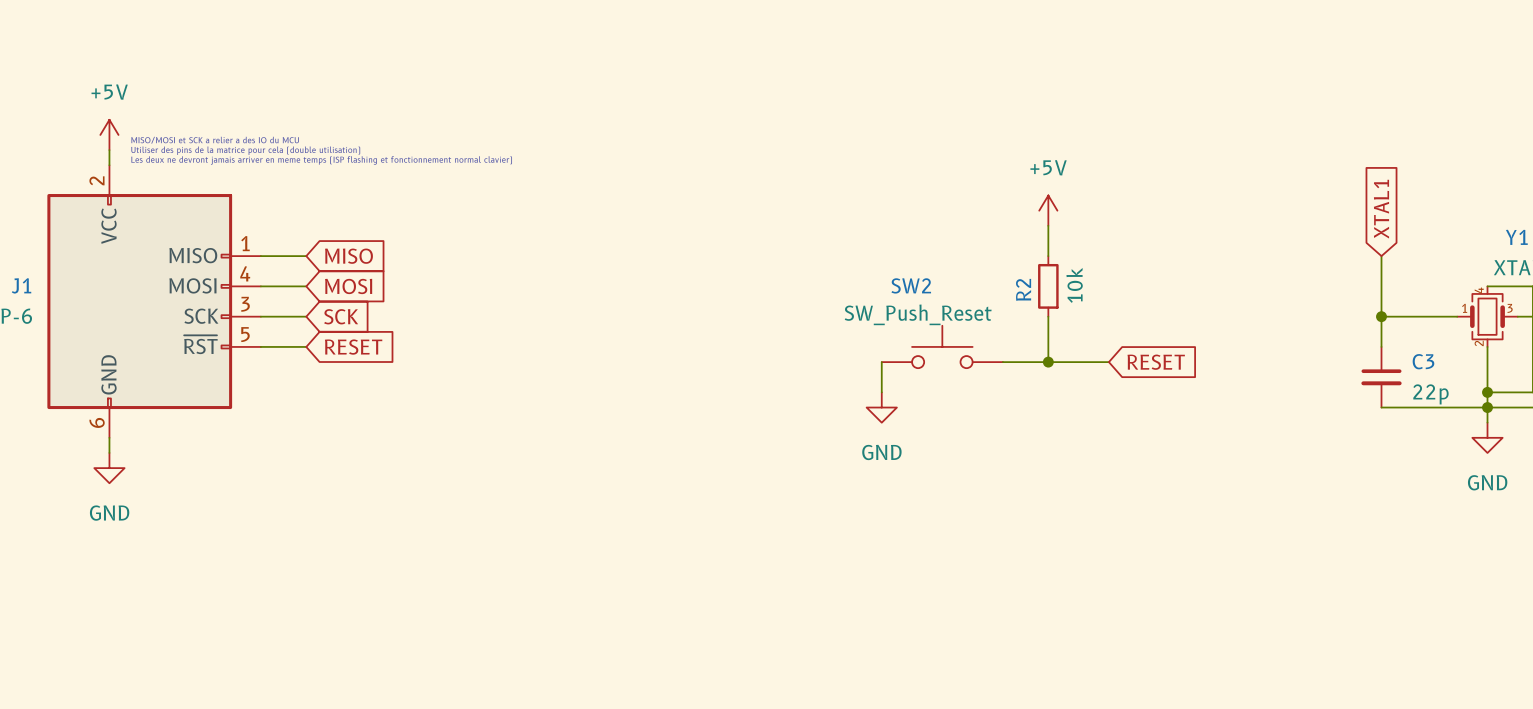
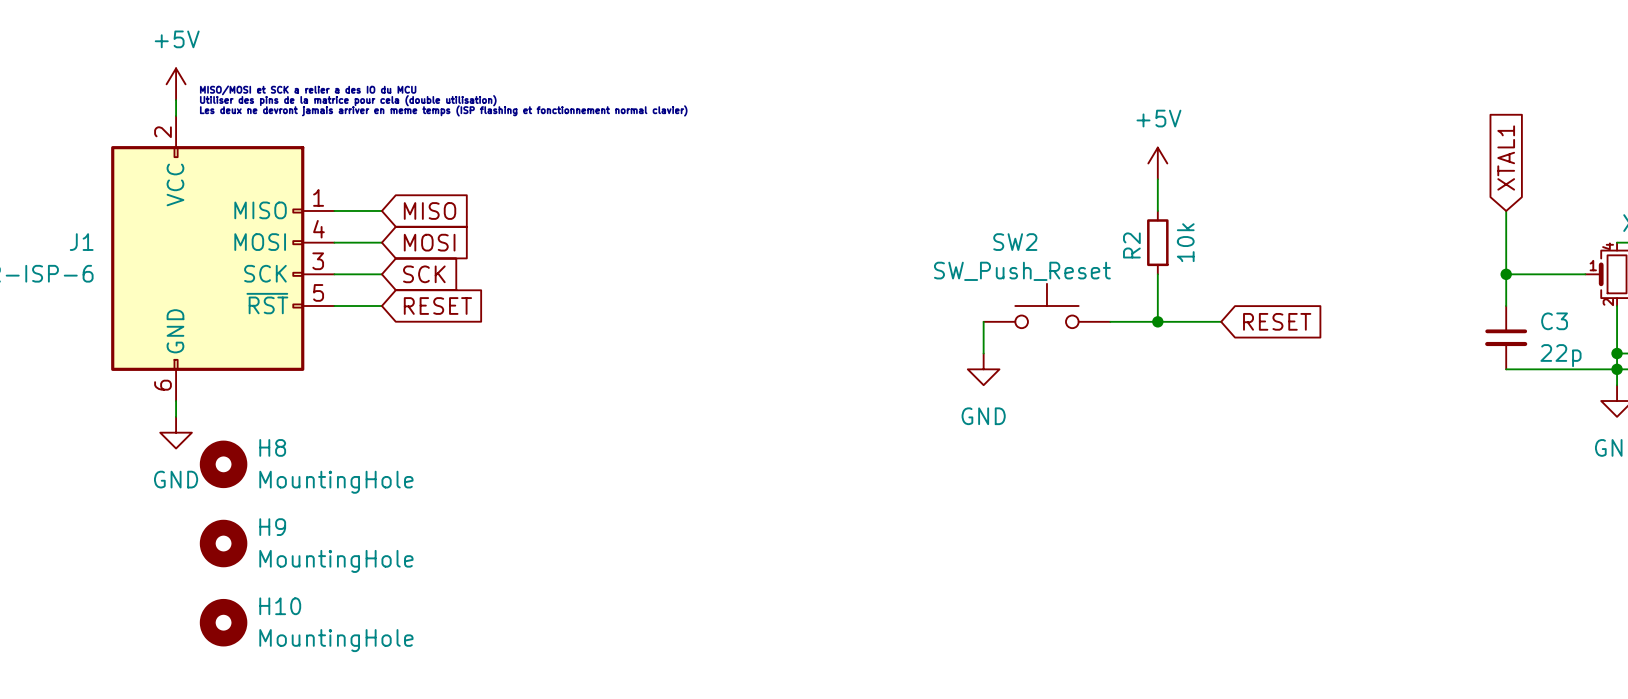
H8: none -> MountingHole (223, 464)
H9: none -> MountingHole (223, 543)
H10: none -> MountingHole (223, 622)

